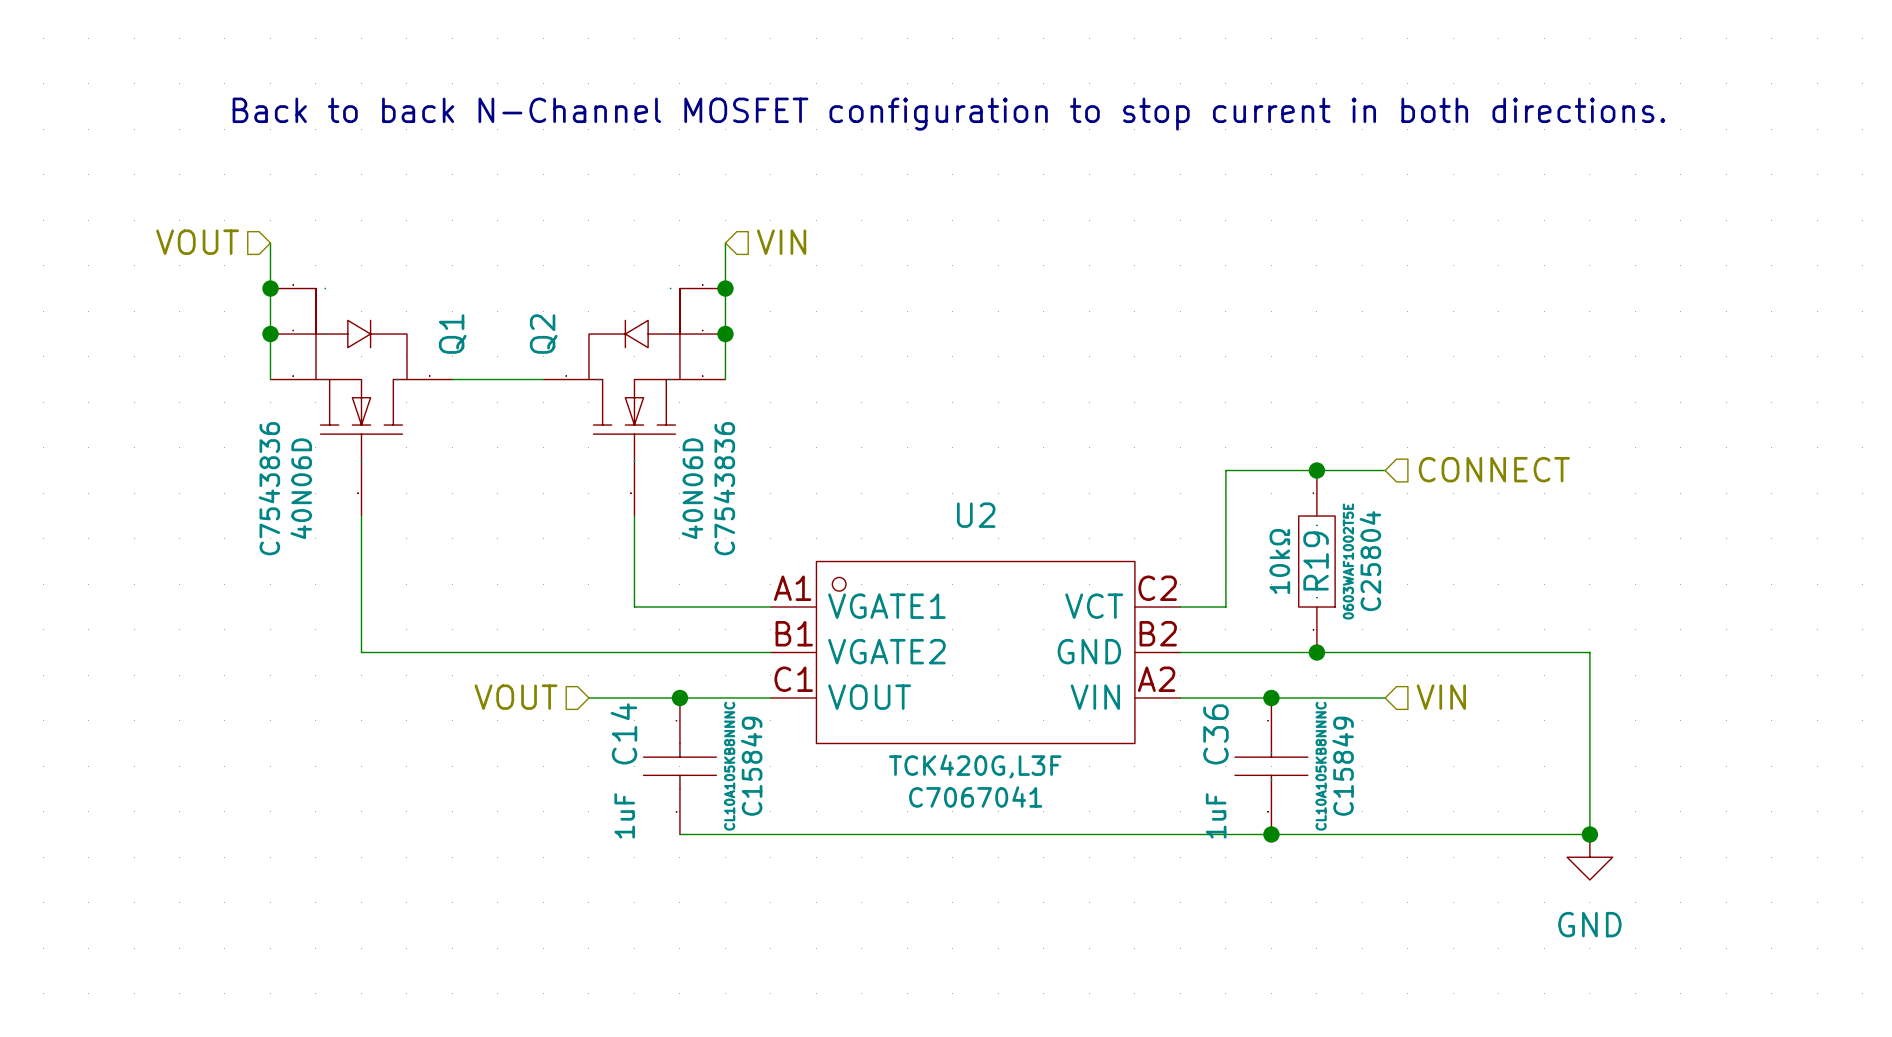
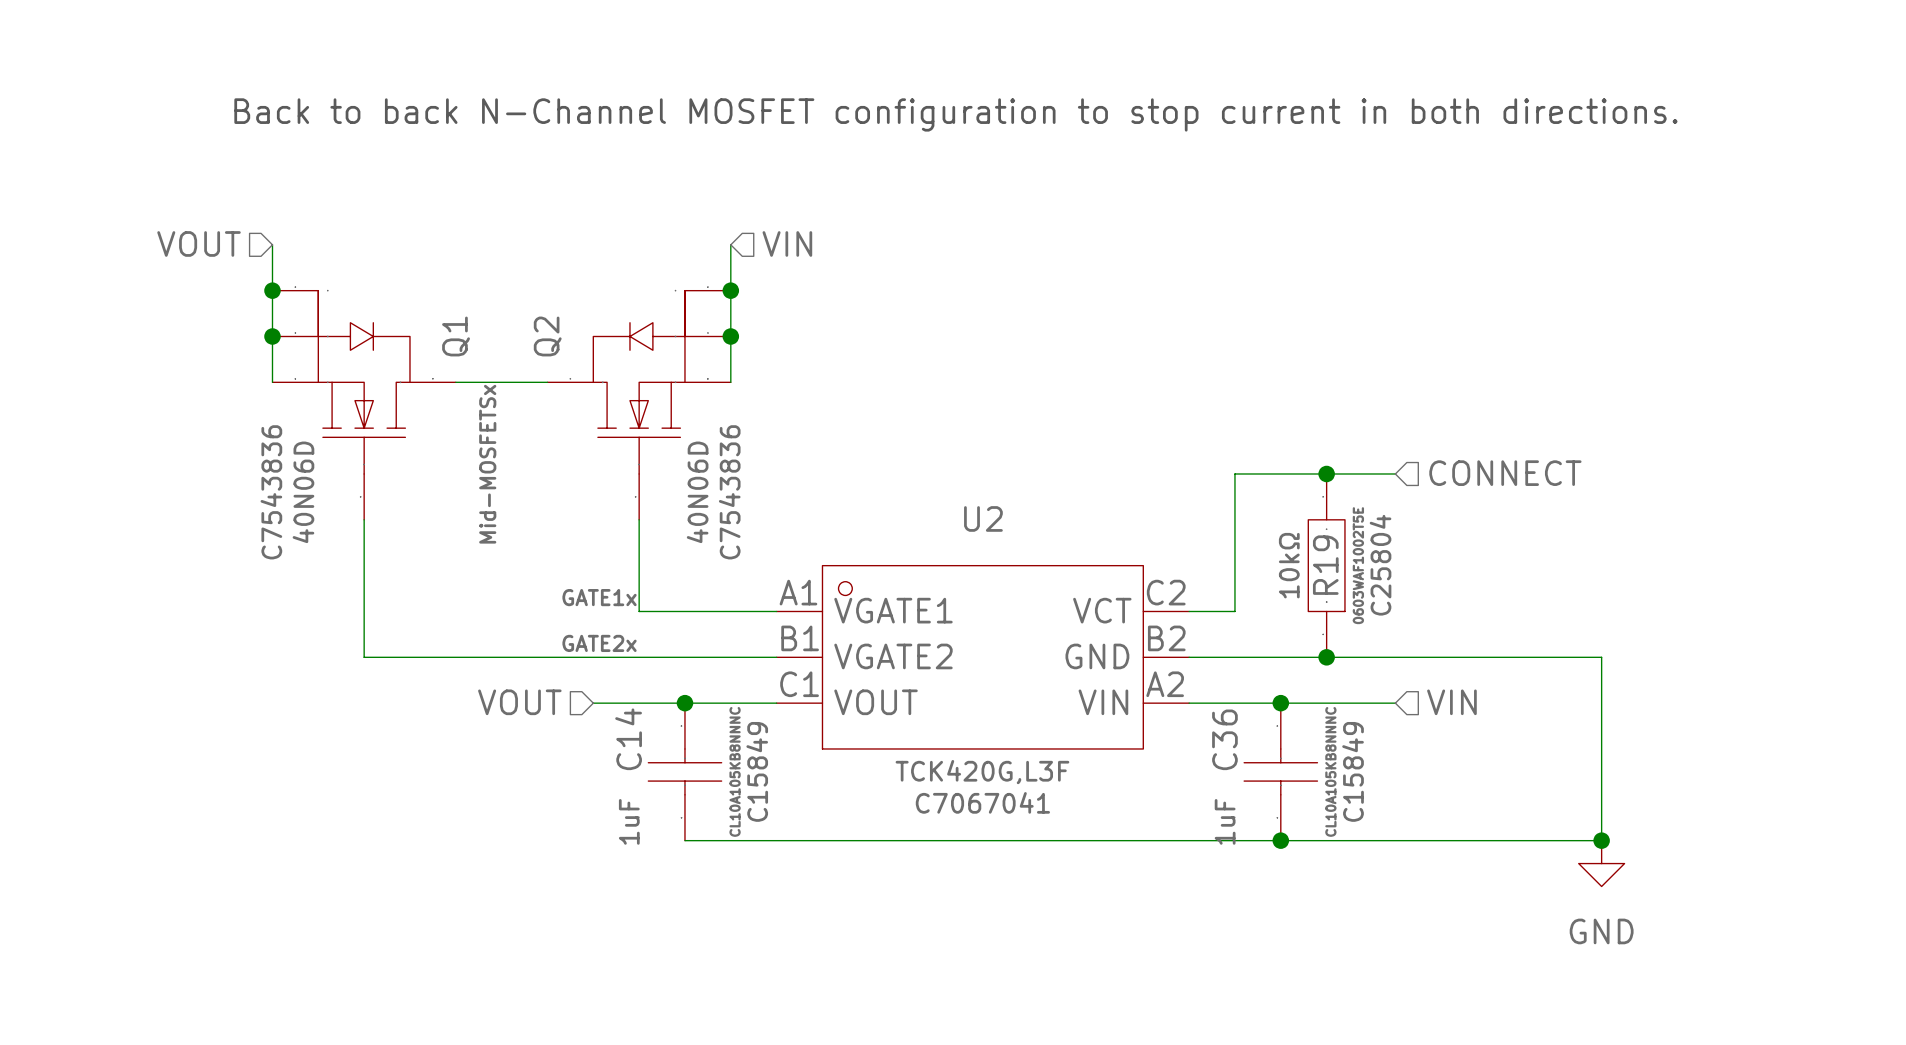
label: none -> Mid-MOSFETSx (487, 464)
label: none -> GATE1x (599, 597)
label: none -> GATE2x (599, 643)

